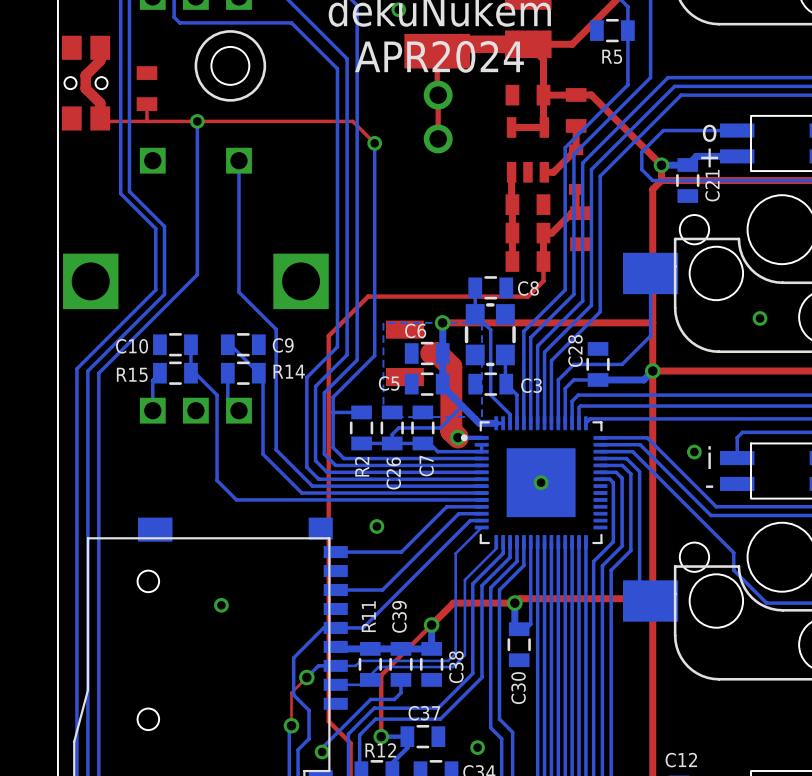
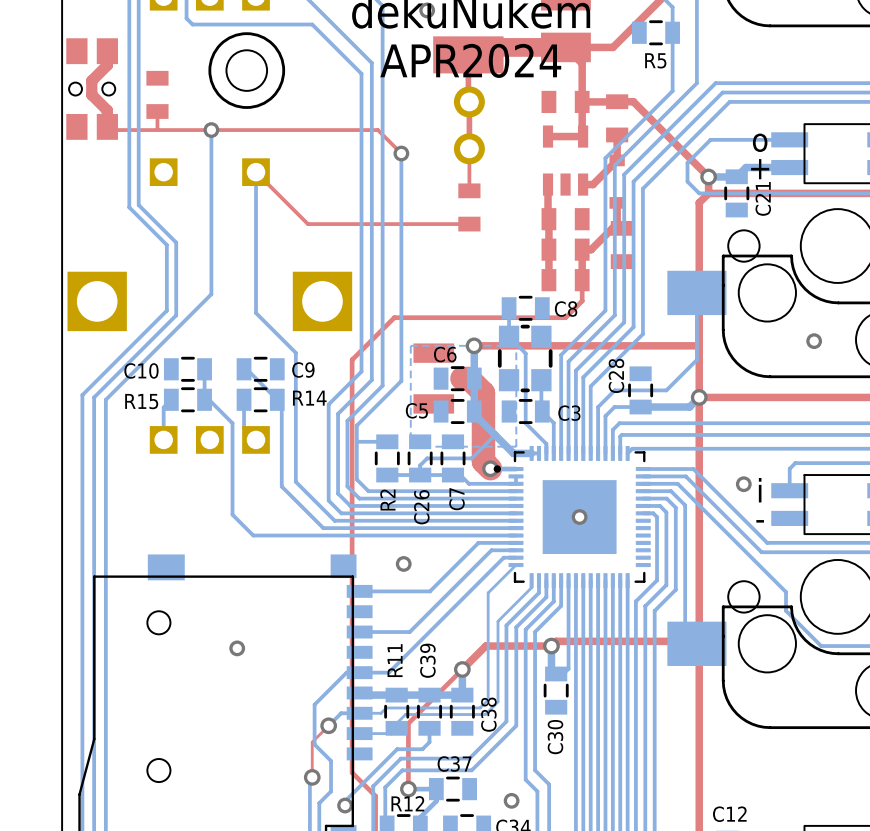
top track: none -> (469, 148) (469, 190)
top track: none -> (256, 172) (307, 224) (469, 224)
part: none -> (469, 207)

